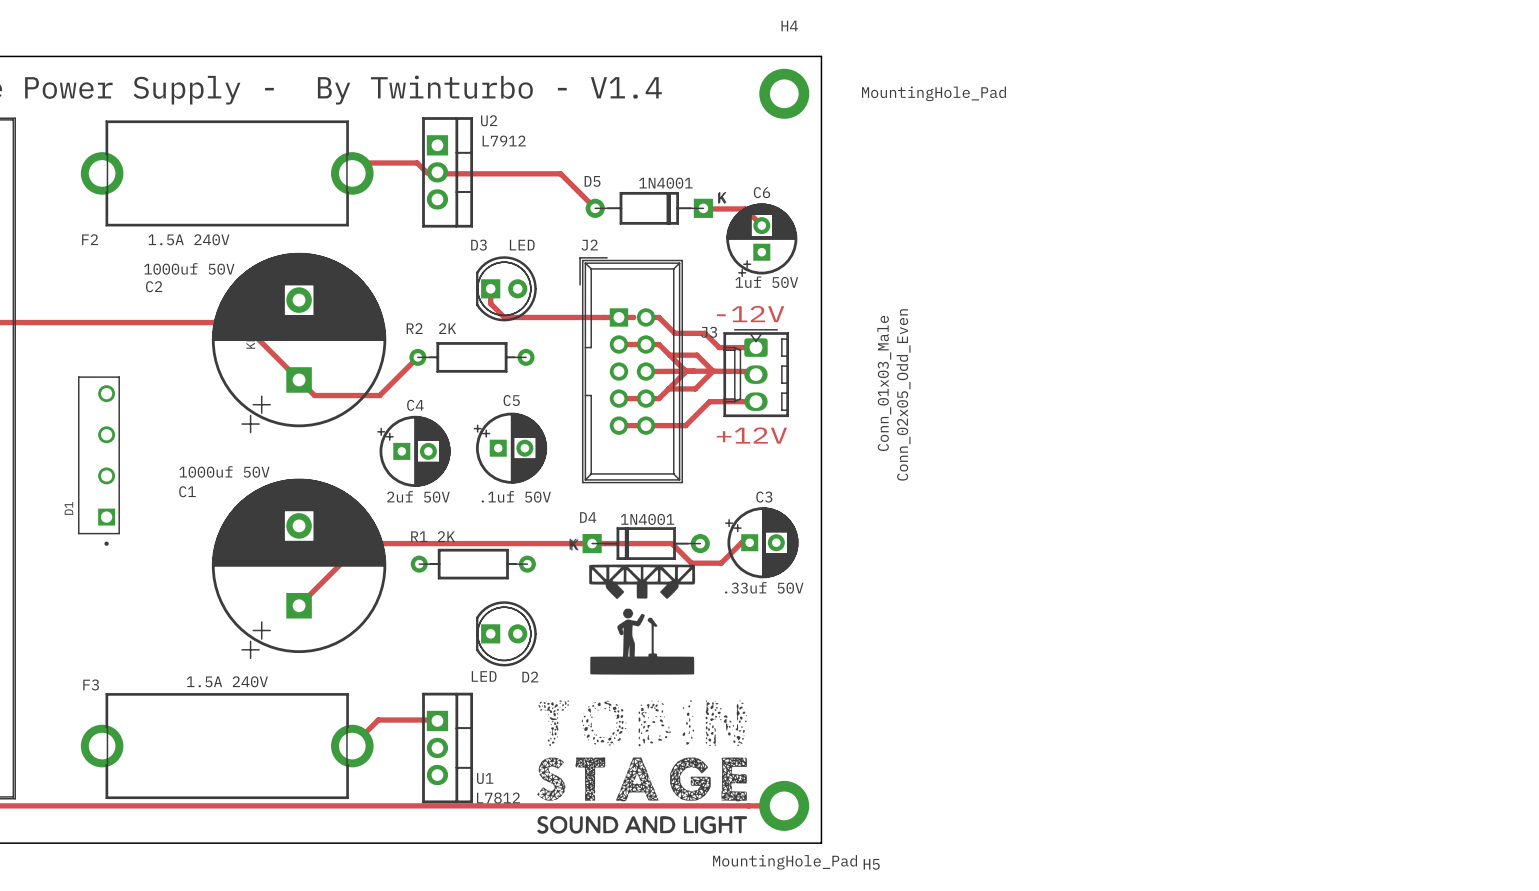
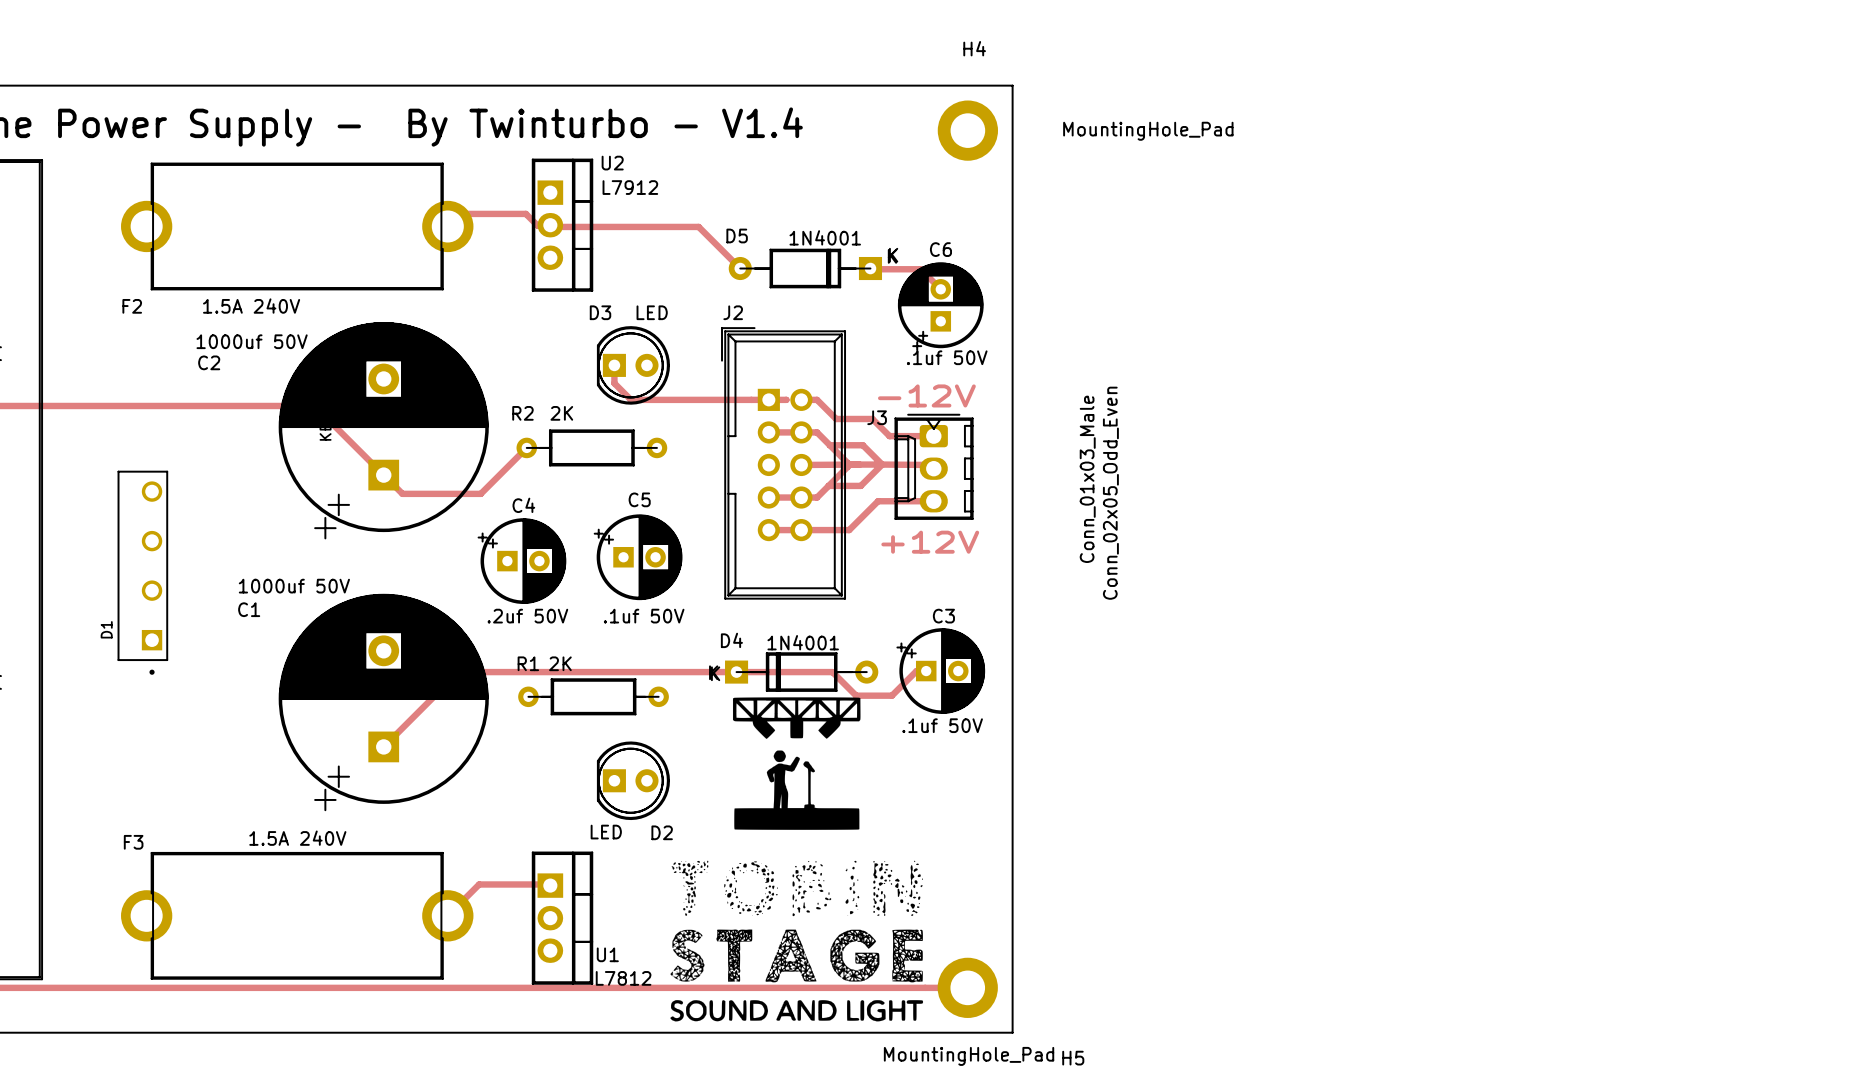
C6 value: 1uf 50V (766, 282) -> .1uf 50V (947, 357)
C4 value: 2uf 50V (418, 496) -> .2uf 50V (527, 616)
C3 value: .33uf 50V (764, 587) -> .1uf 50V (942, 725)

